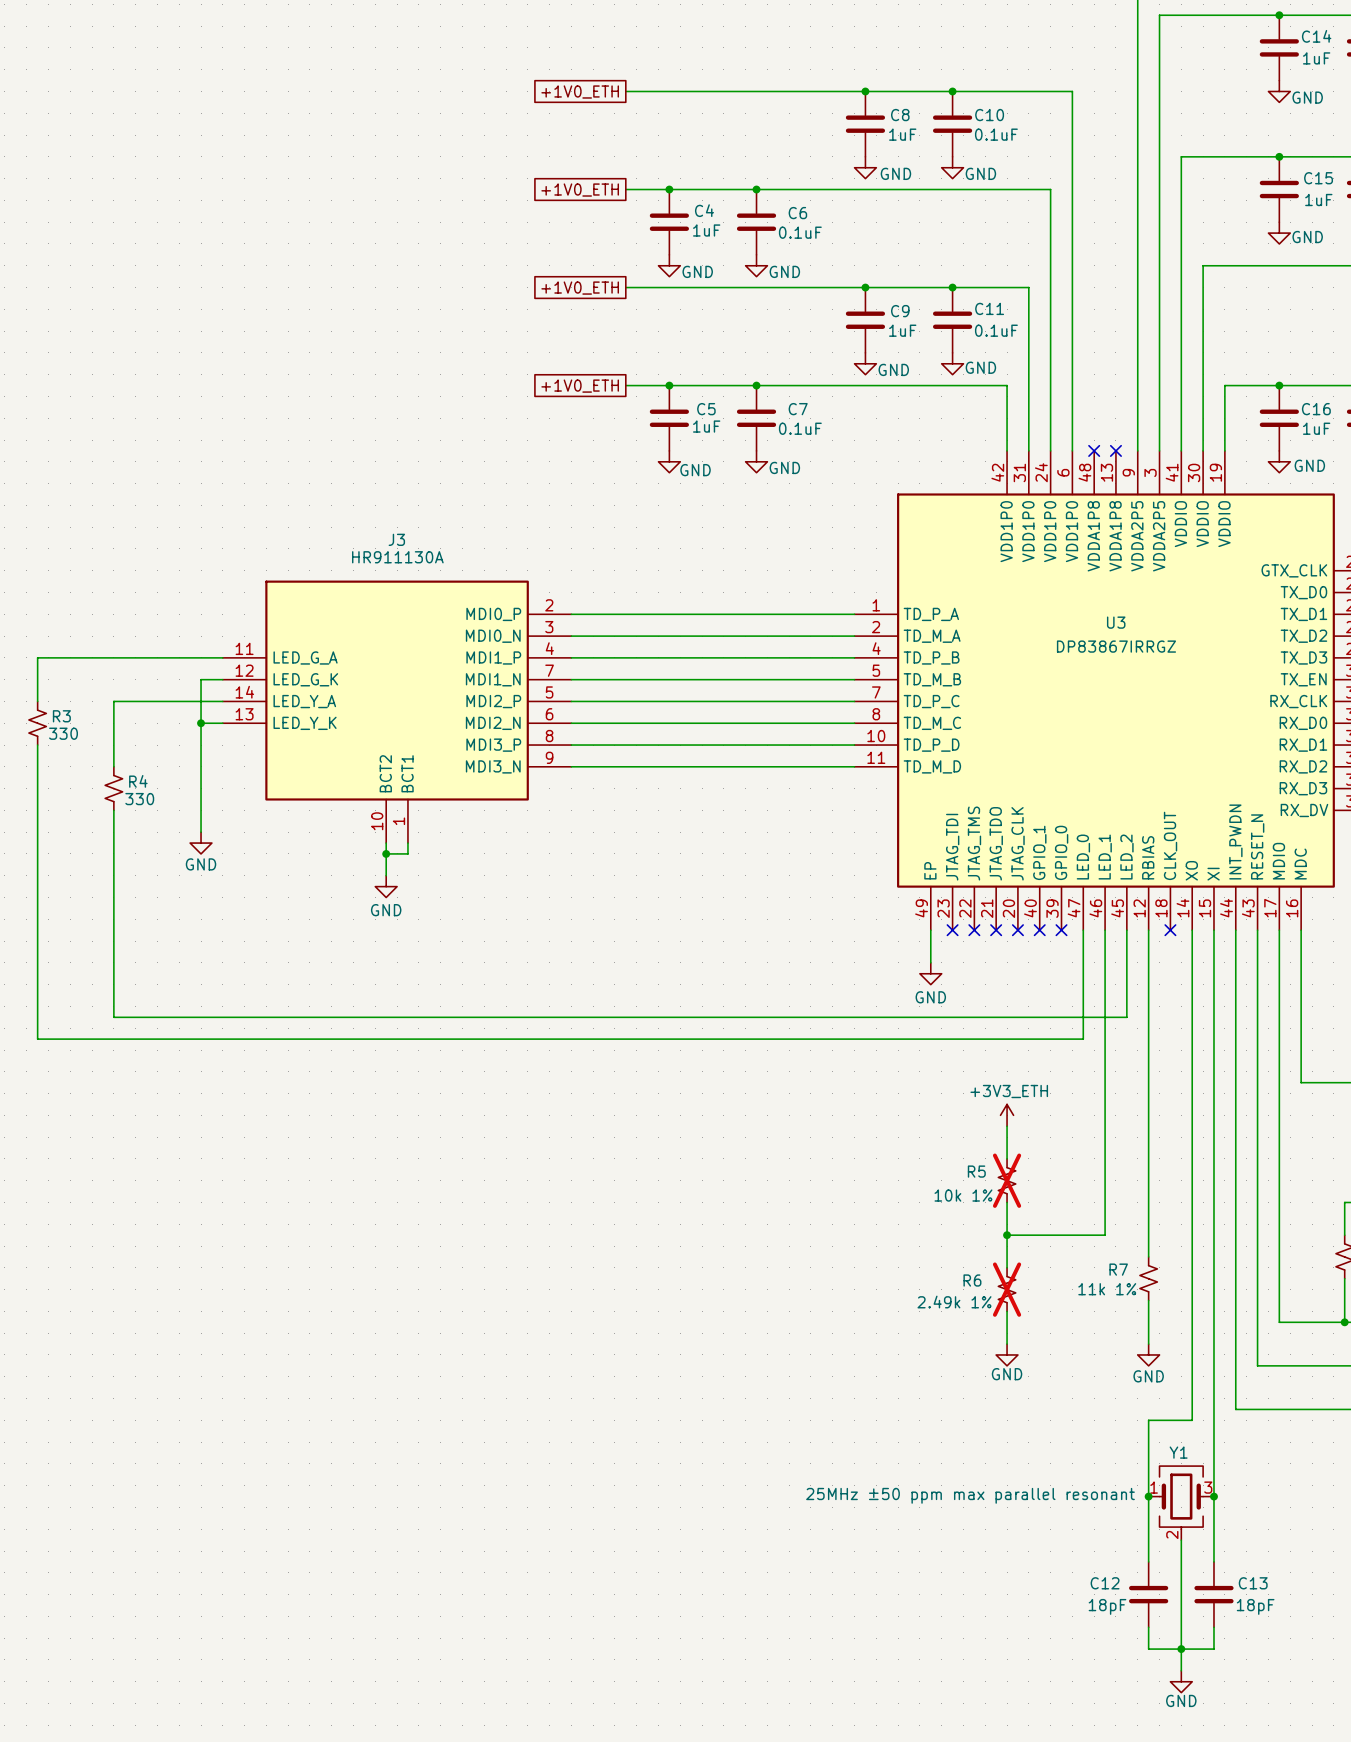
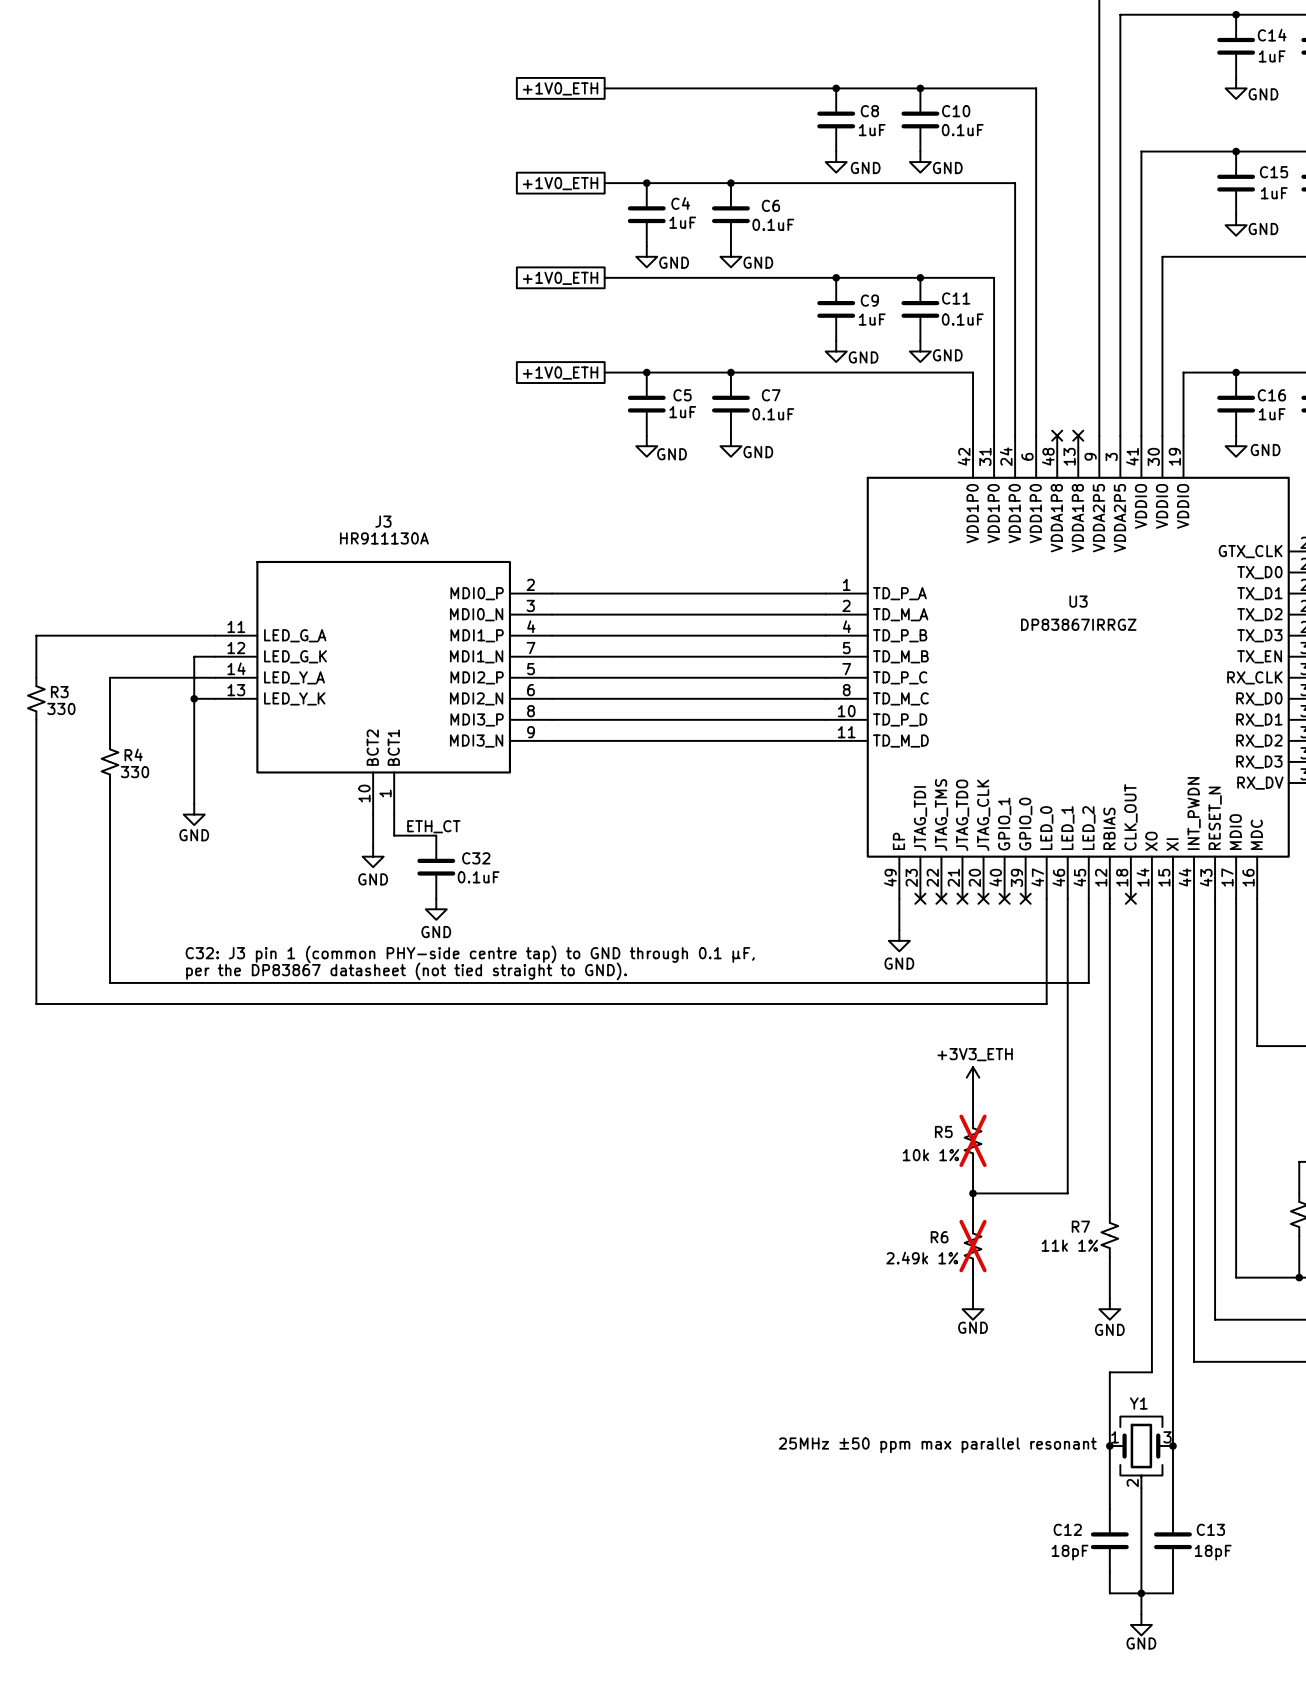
wire: (386, 853) (407, 853) -> (436, 835) (394, 835) (394, 825)
junction: (386, 853) -> none
label: none -> ETH_CT (433, 826)
C32: none -> 0.1uF (436, 867)
power symbol: none -> GND (436, 909)
text: none -> C32: J3 pin 1 (common PHY-side centre tap) to GND through 0.1 µF, (470, 954)
text: none -> per the DP83867 datasheet (not tied straight to GND). (406, 971)

